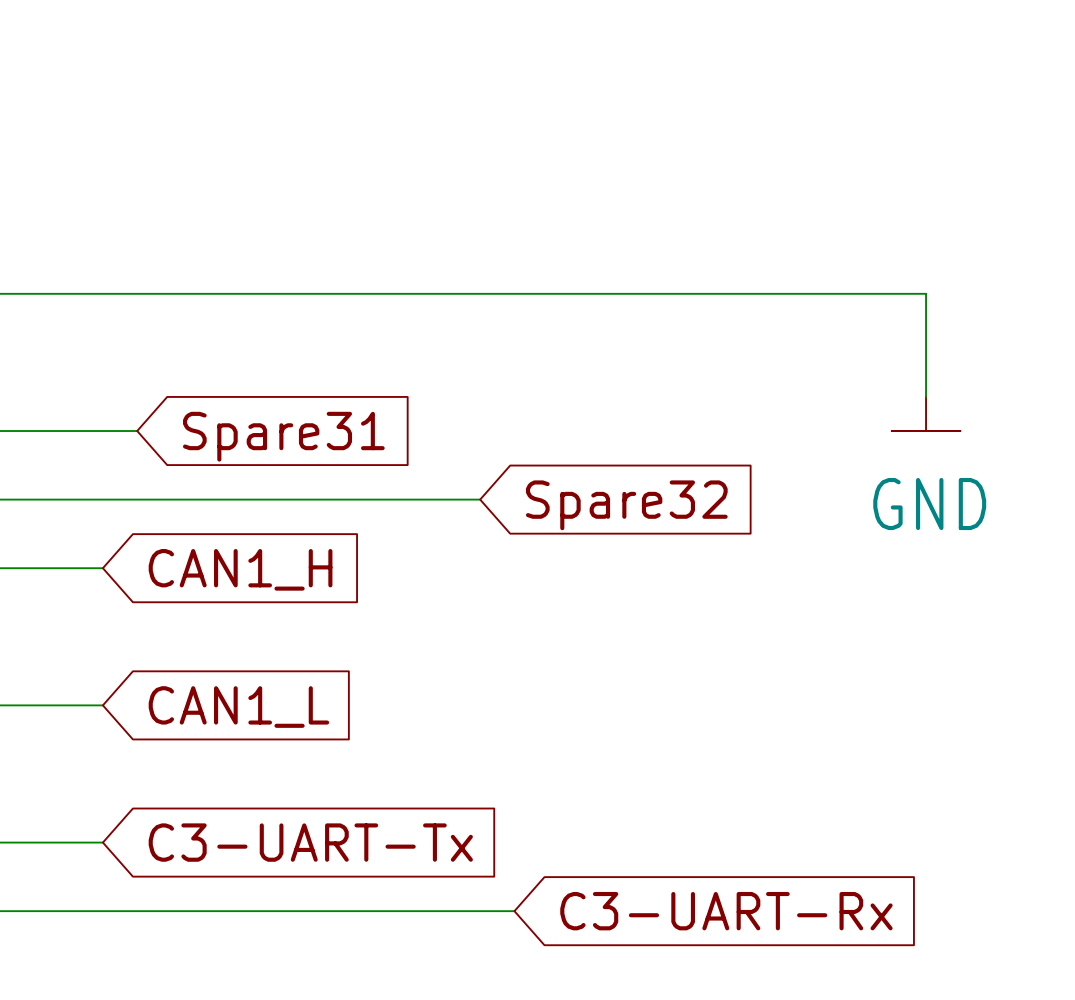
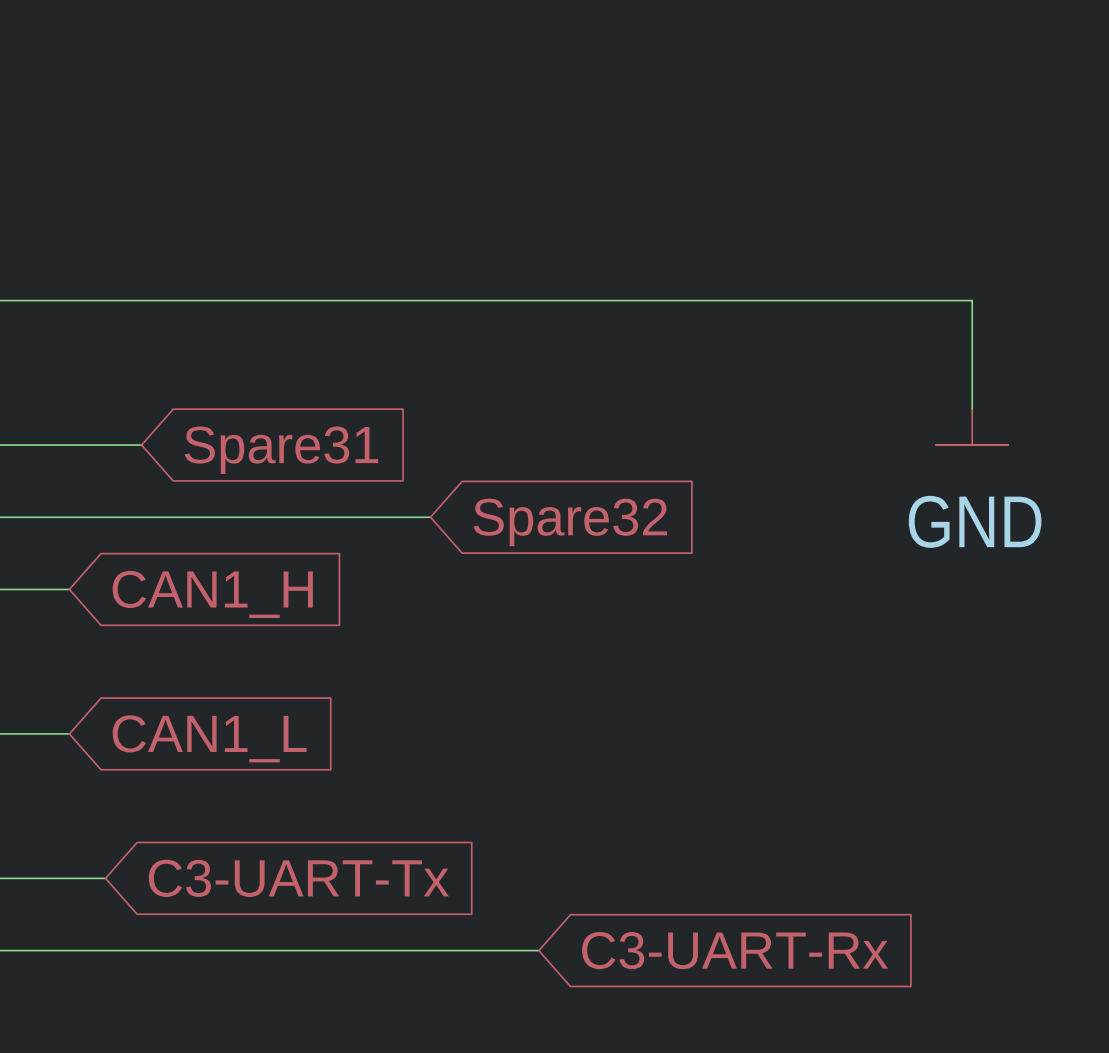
wire: (411, 499) (480, 499) -> none
global label position: Spare32 (626, 505) -> Spare32 (570, 522)
wire: (68, 568) (102, 568) -> none
global label position: CAN1_H (240, 569) -> CAN1_H (212, 594)
wire: (68, 705) (102, 705) -> none
global label position: CAN1_L (238, 707) -> CAN1_L (209, 738)

